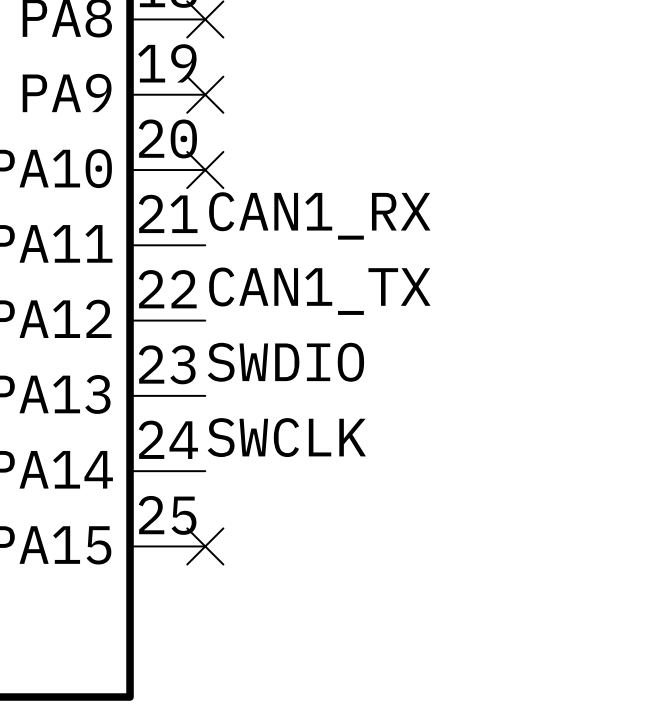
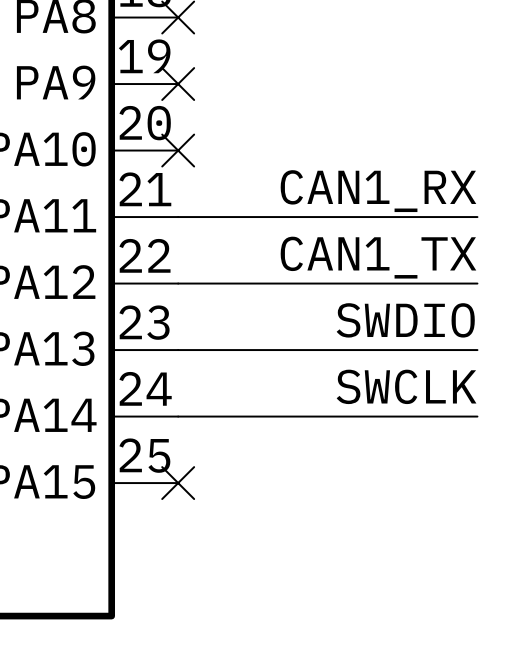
label position: CAN1_RX (319, 215) -> CAN1_RX (378, 191)
wire: none -> (178, 217) (477, 217)
label position: CAN1_TX (319, 291) -> CAN1_TX (378, 257)
wire: none -> (178, 283) (477, 283)
label position: SWDIO (285, 362) -> SWDIO (405, 320)
wire: none -> (178, 350) (477, 350)
label position: SWCLK (286, 437) -> SWCLK (406, 386)
wire: none -> (178, 416) (477, 416)

